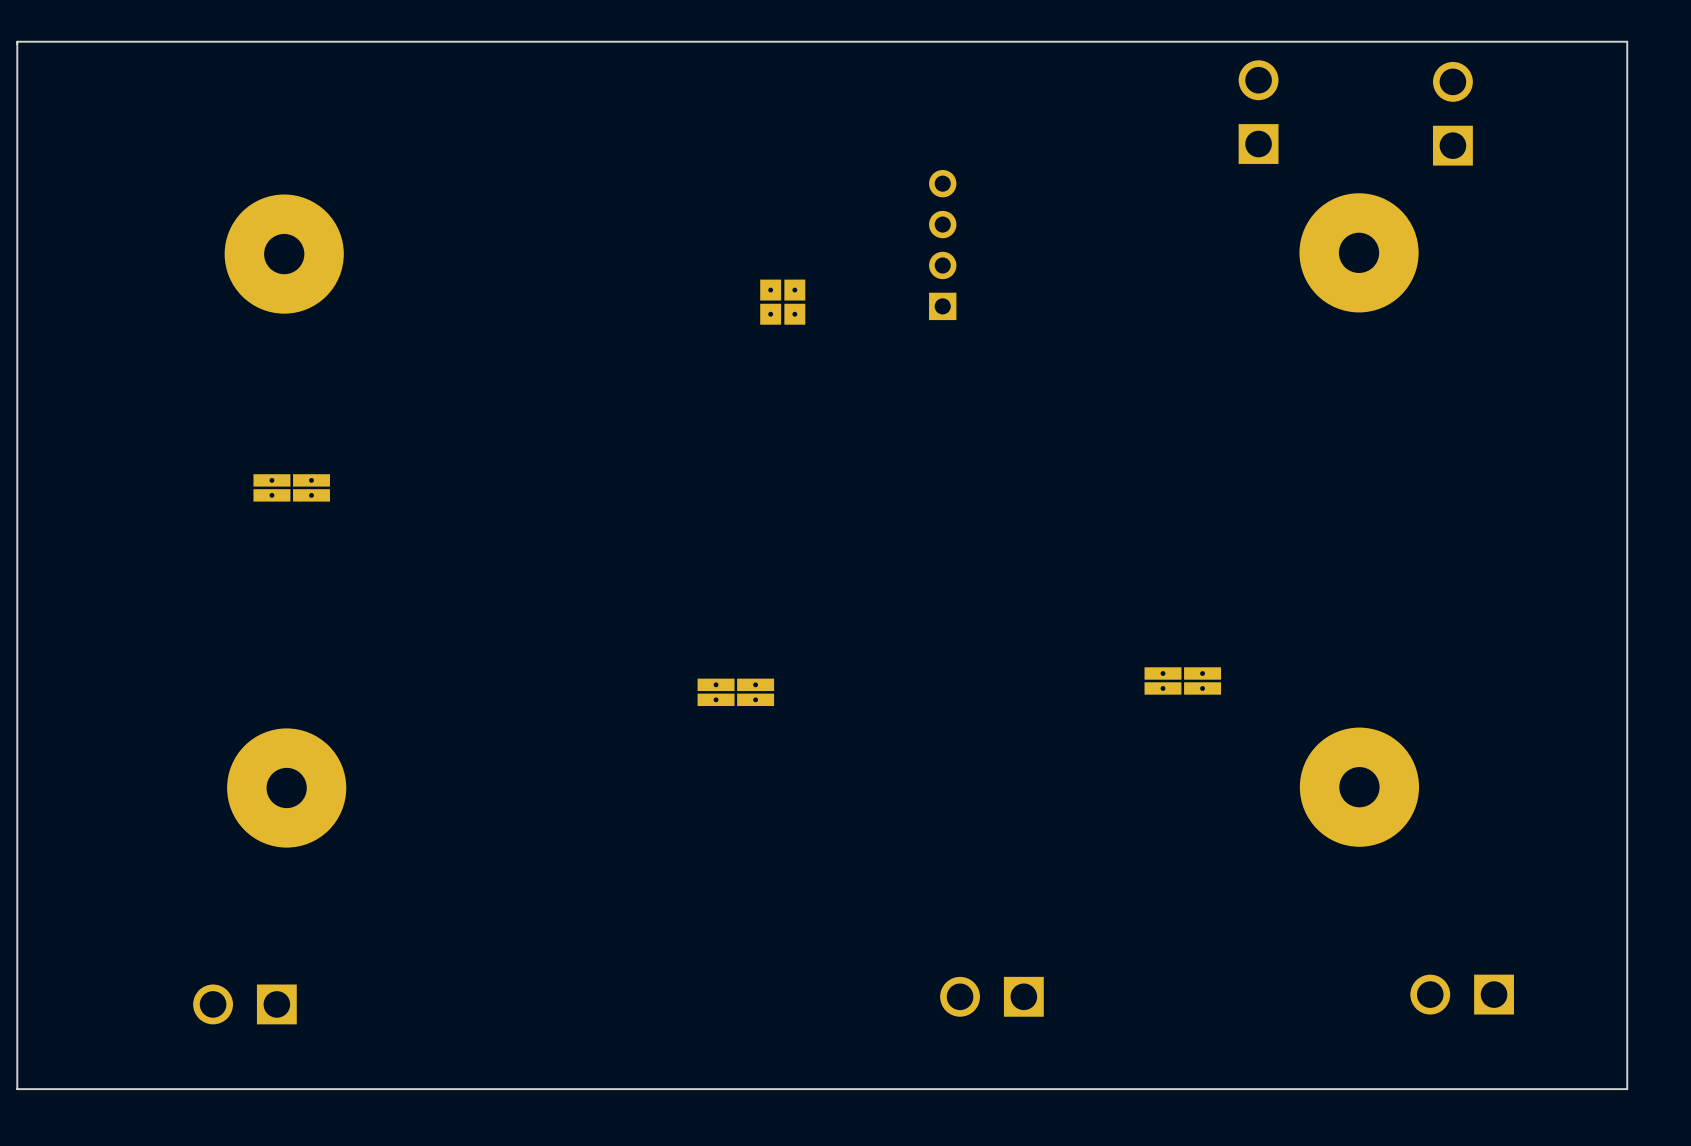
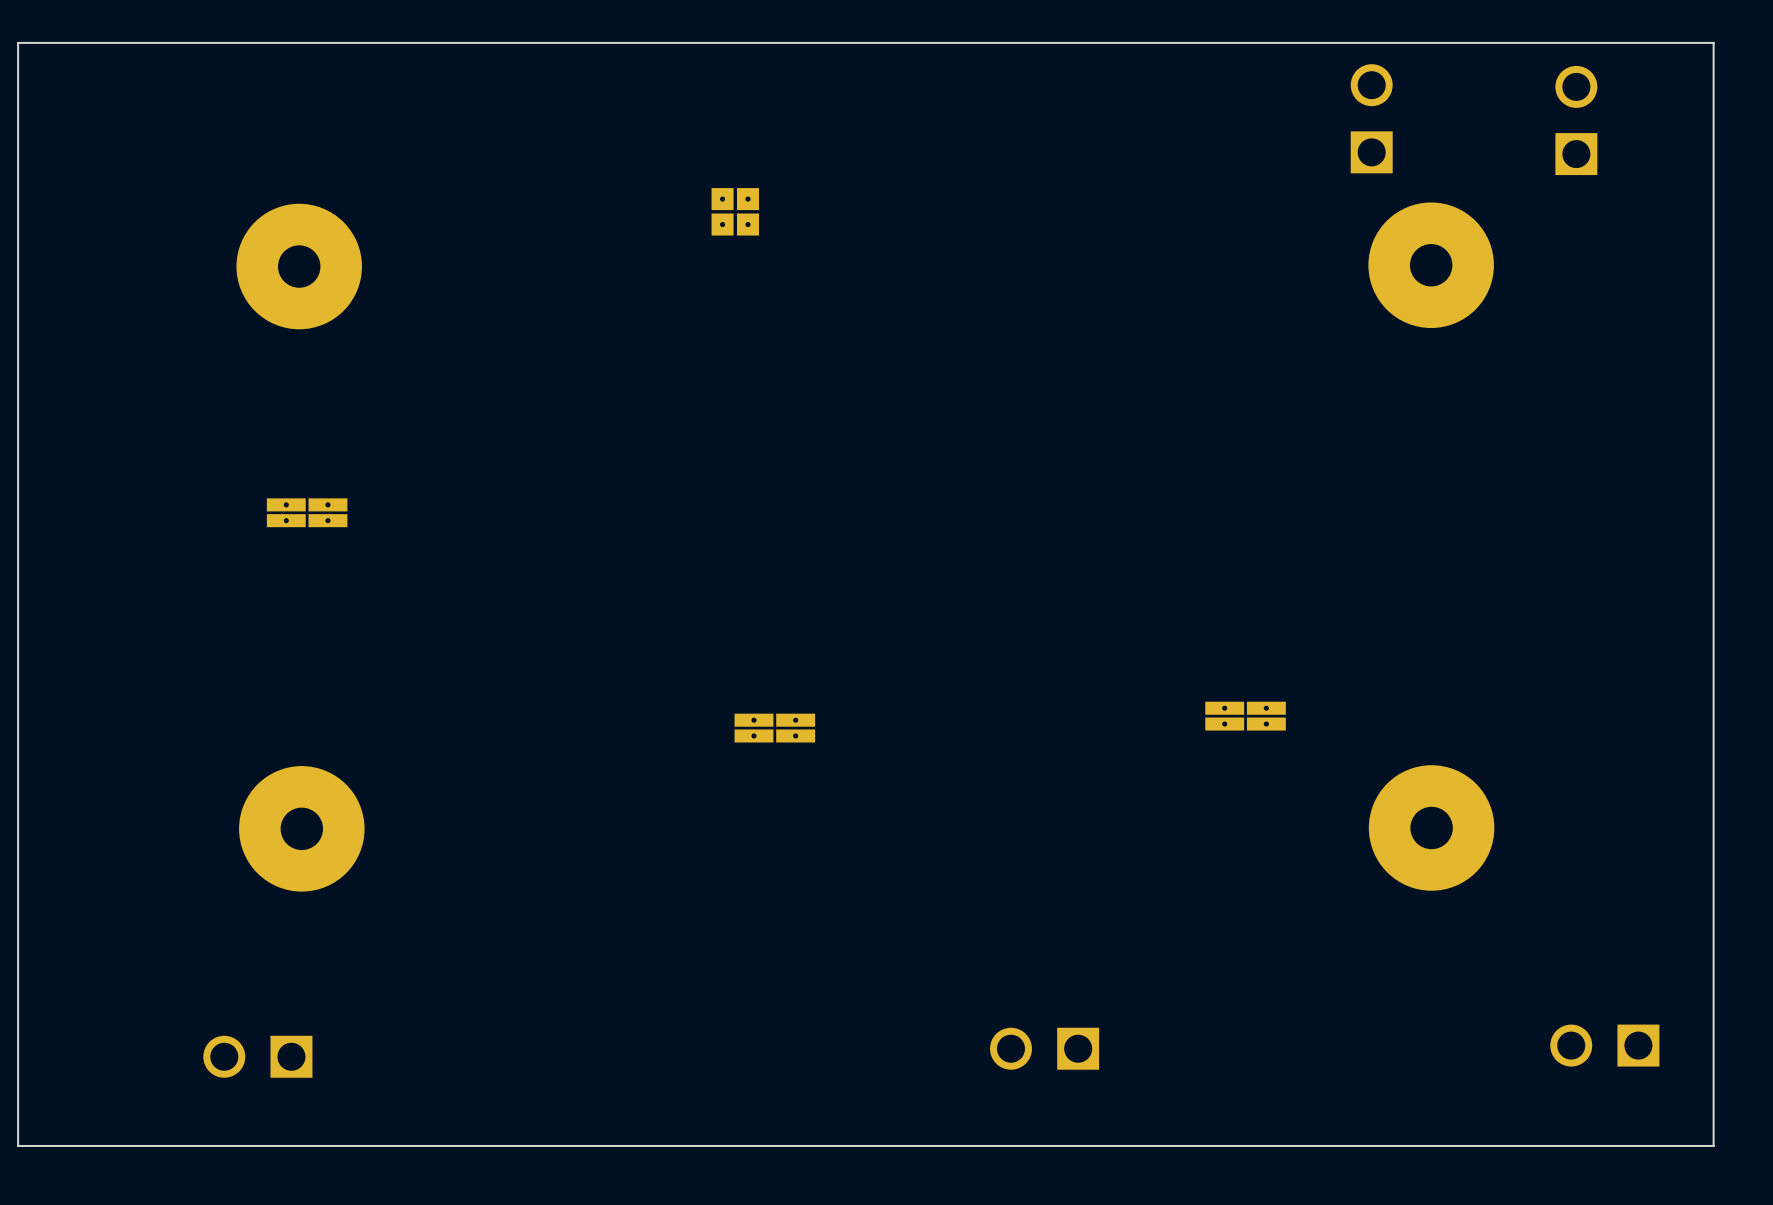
part position: (1258, 112) -> (1371, 118)
part position: (1452, 113) -> (1576, 120)
part: (942, 245) -> none
part position: (782, 302) -> (735, 211)
part position: (1462, 994) -> (1604, 1045)

